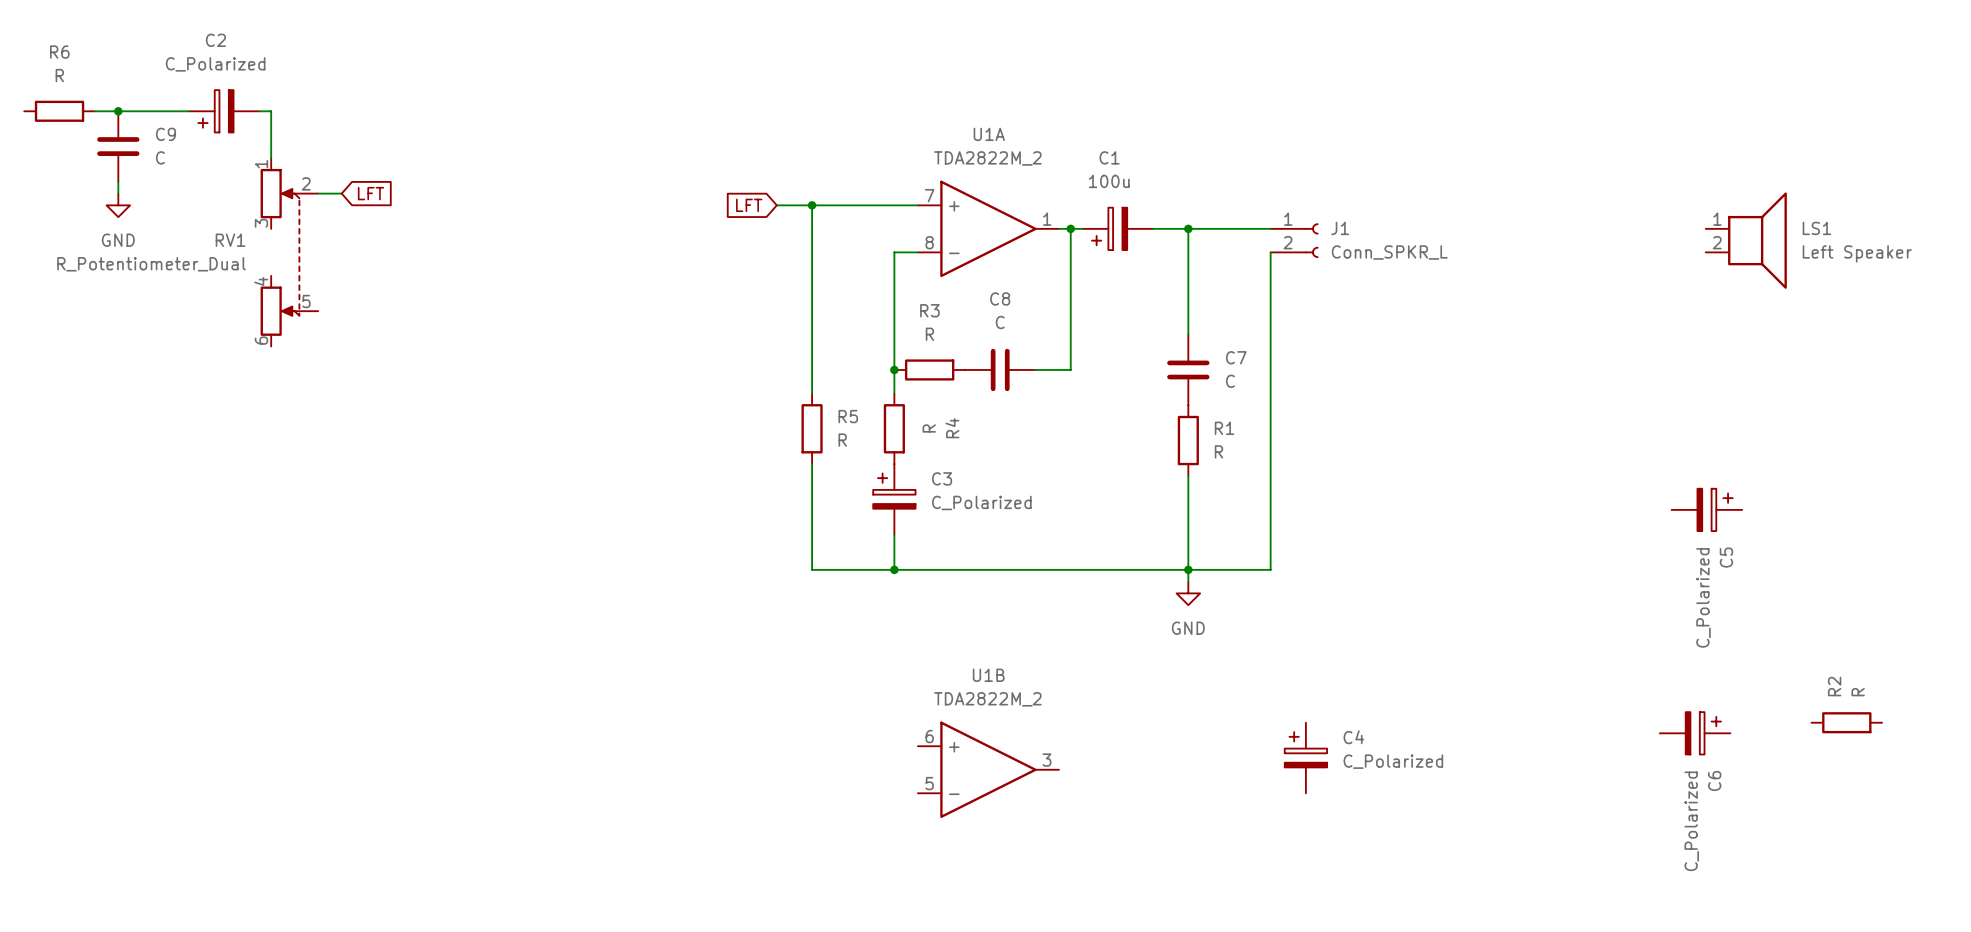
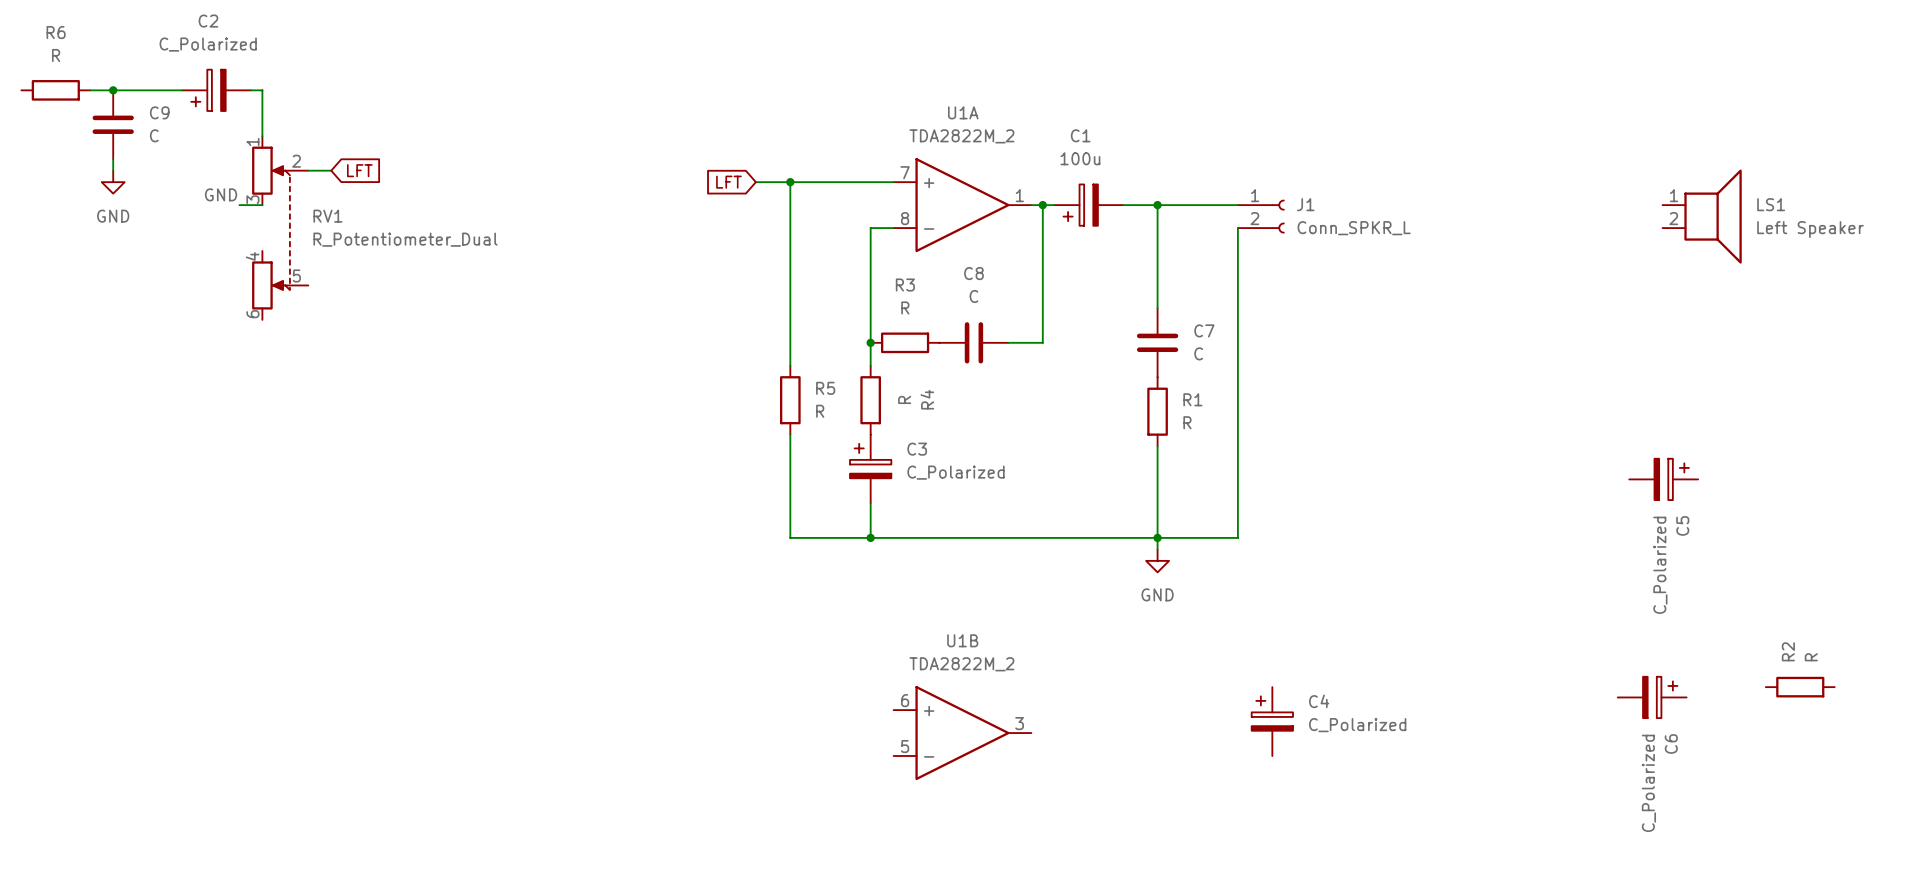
label: none -> GND (221, 194)
wire: none -> (239, 205) (262, 205)
RV1 name position: RV1 (230, 240) -> RV1 (327, 216)
RV1 value position: R_Potentiometer_Dual (151, 264) -> R_Potentiometer_Dual (405, 239)

